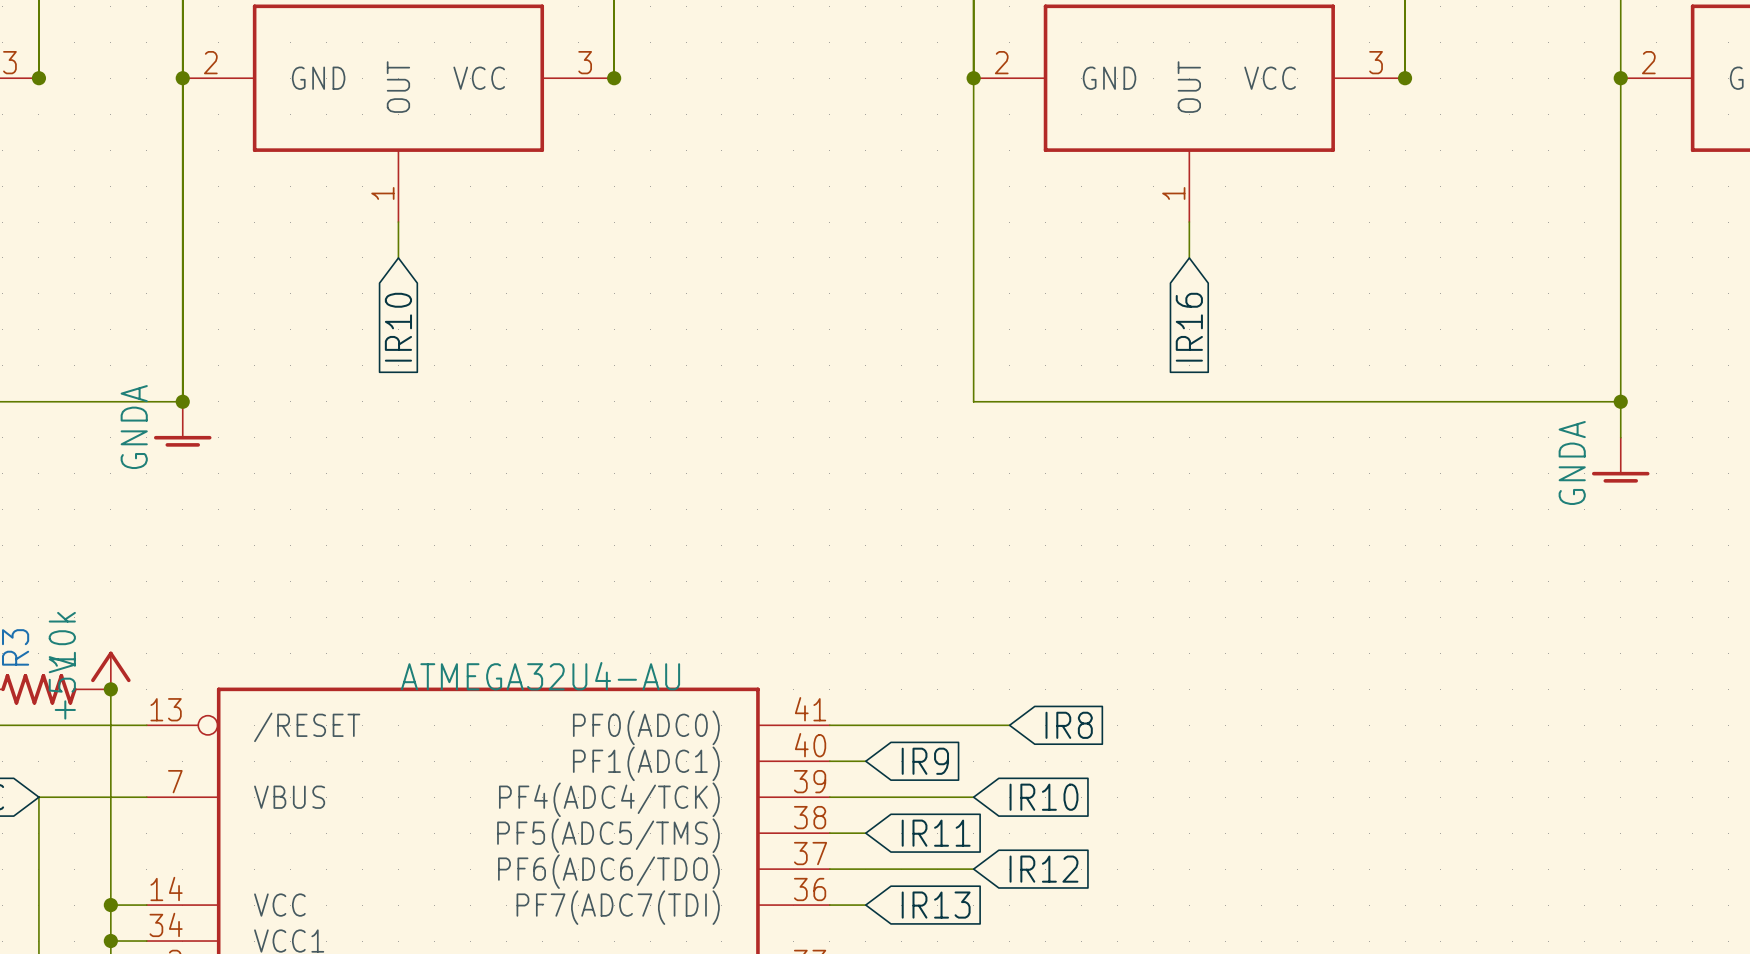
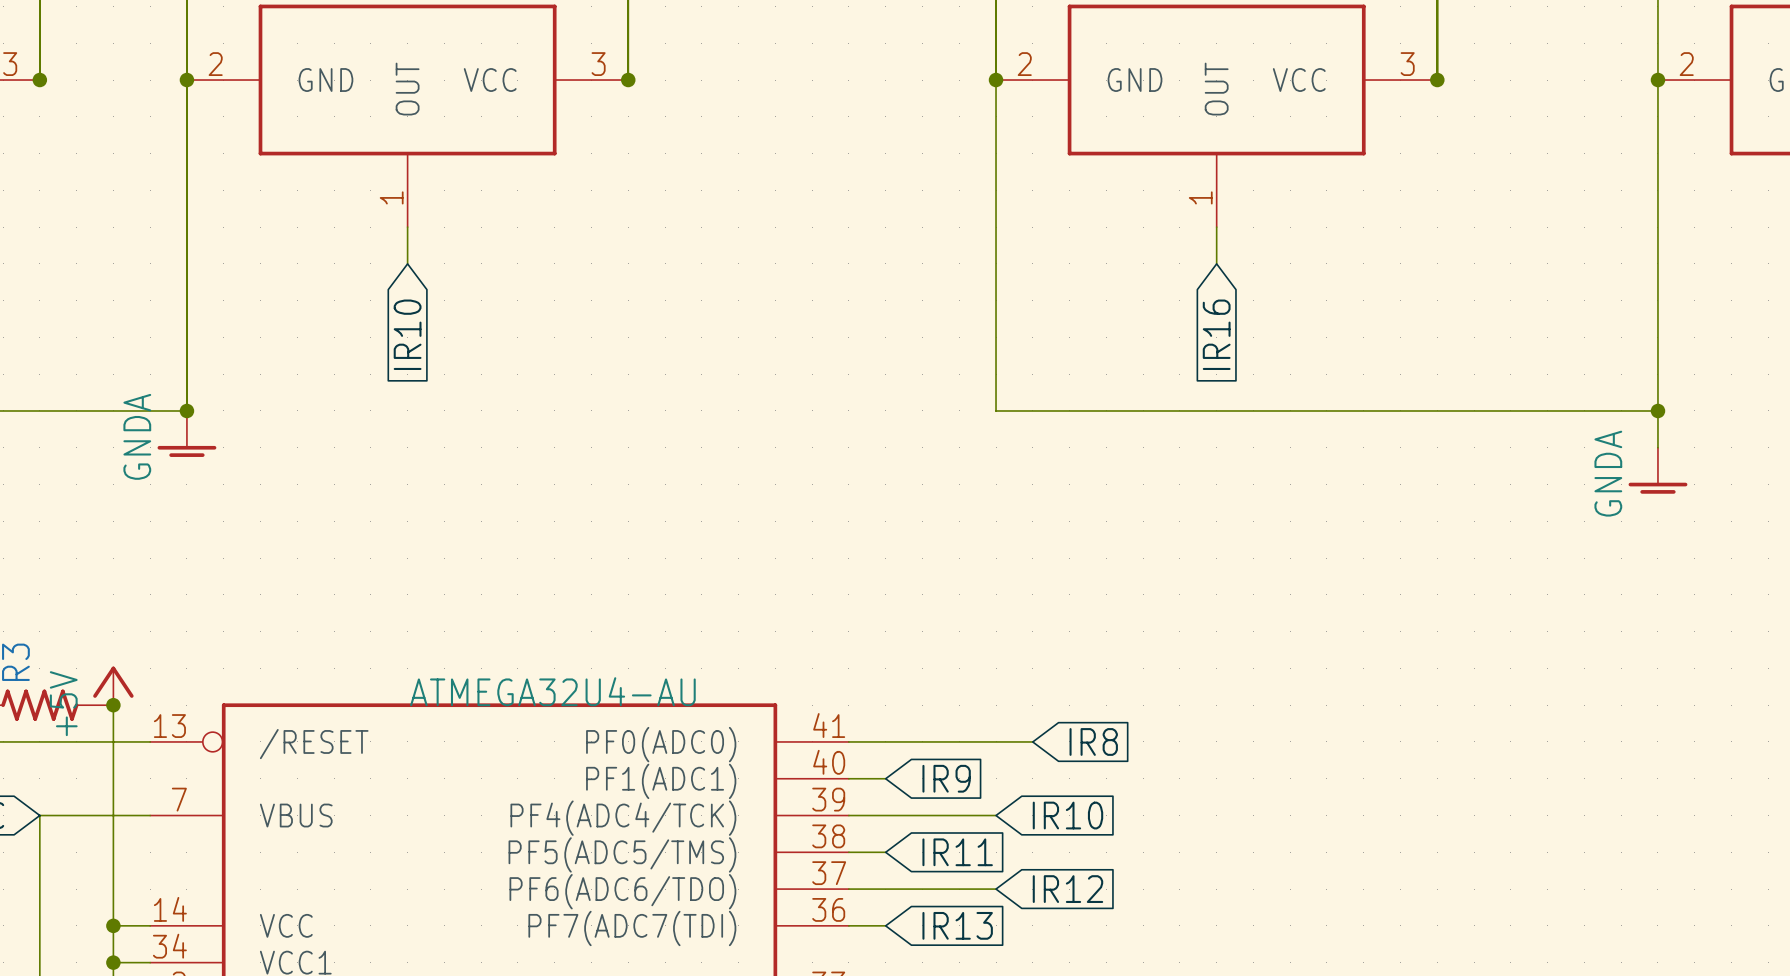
R3 value: 10k (62, 639) -> none

